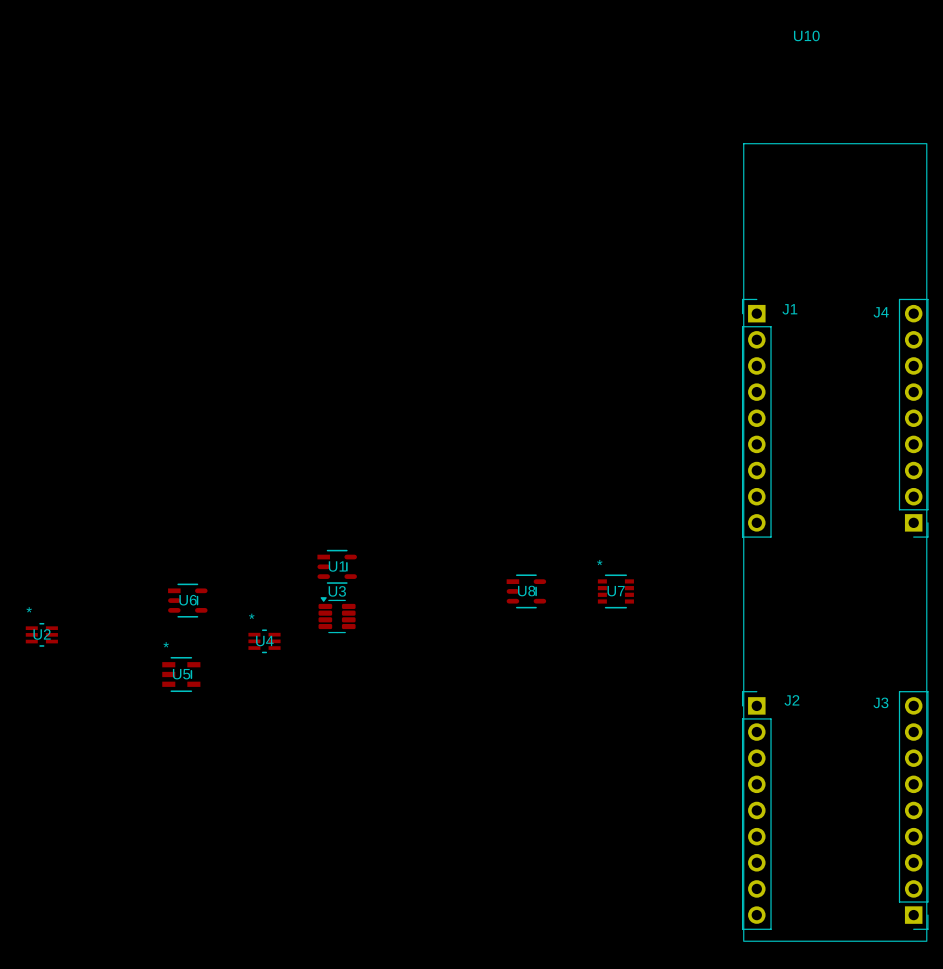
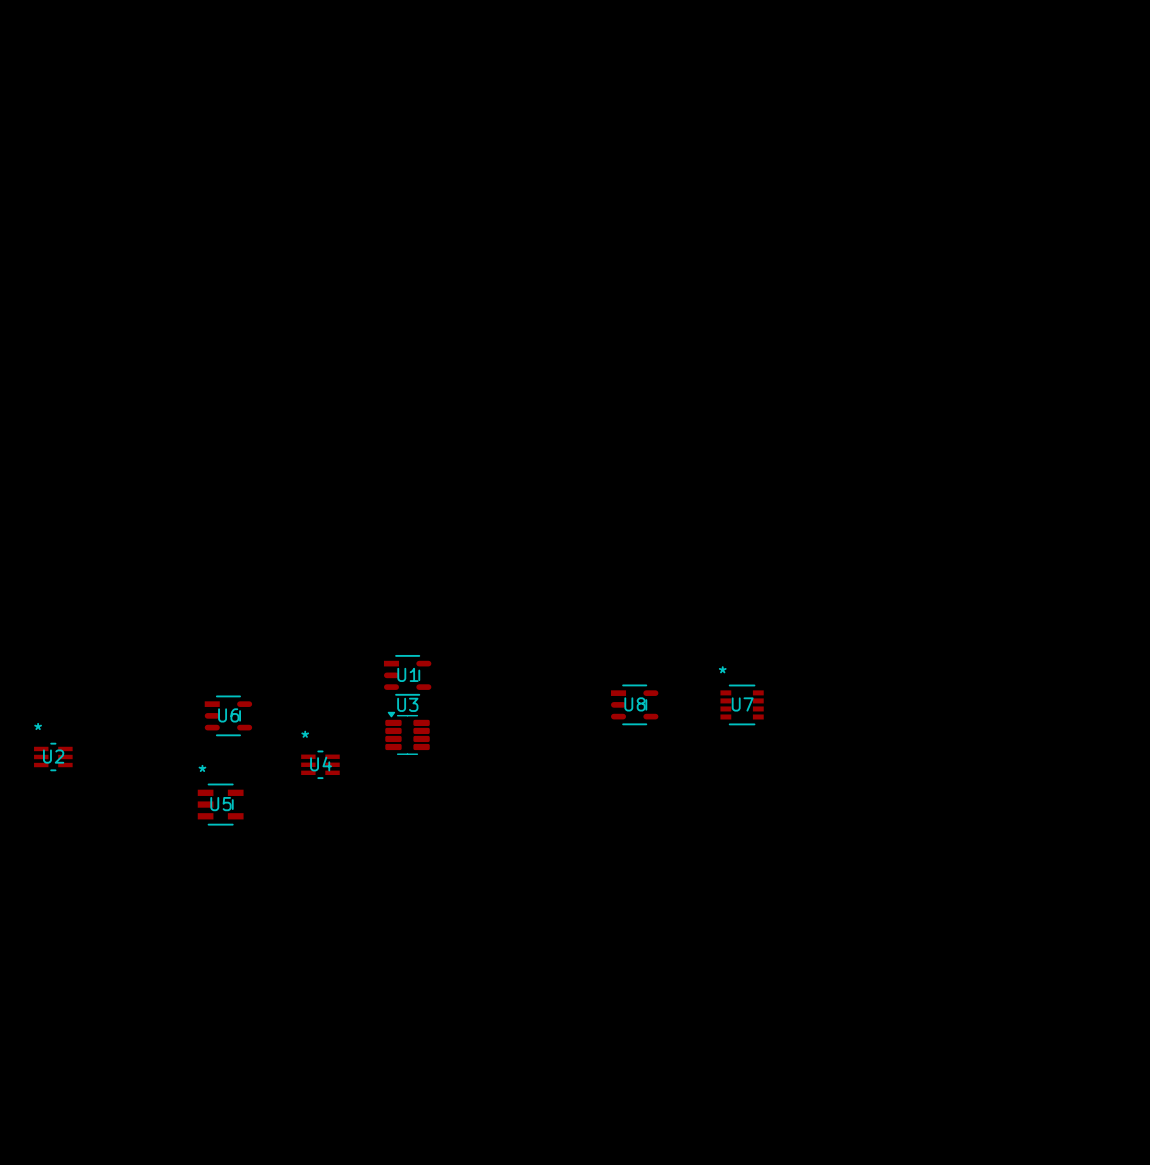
U10: (835, 542) -> none

